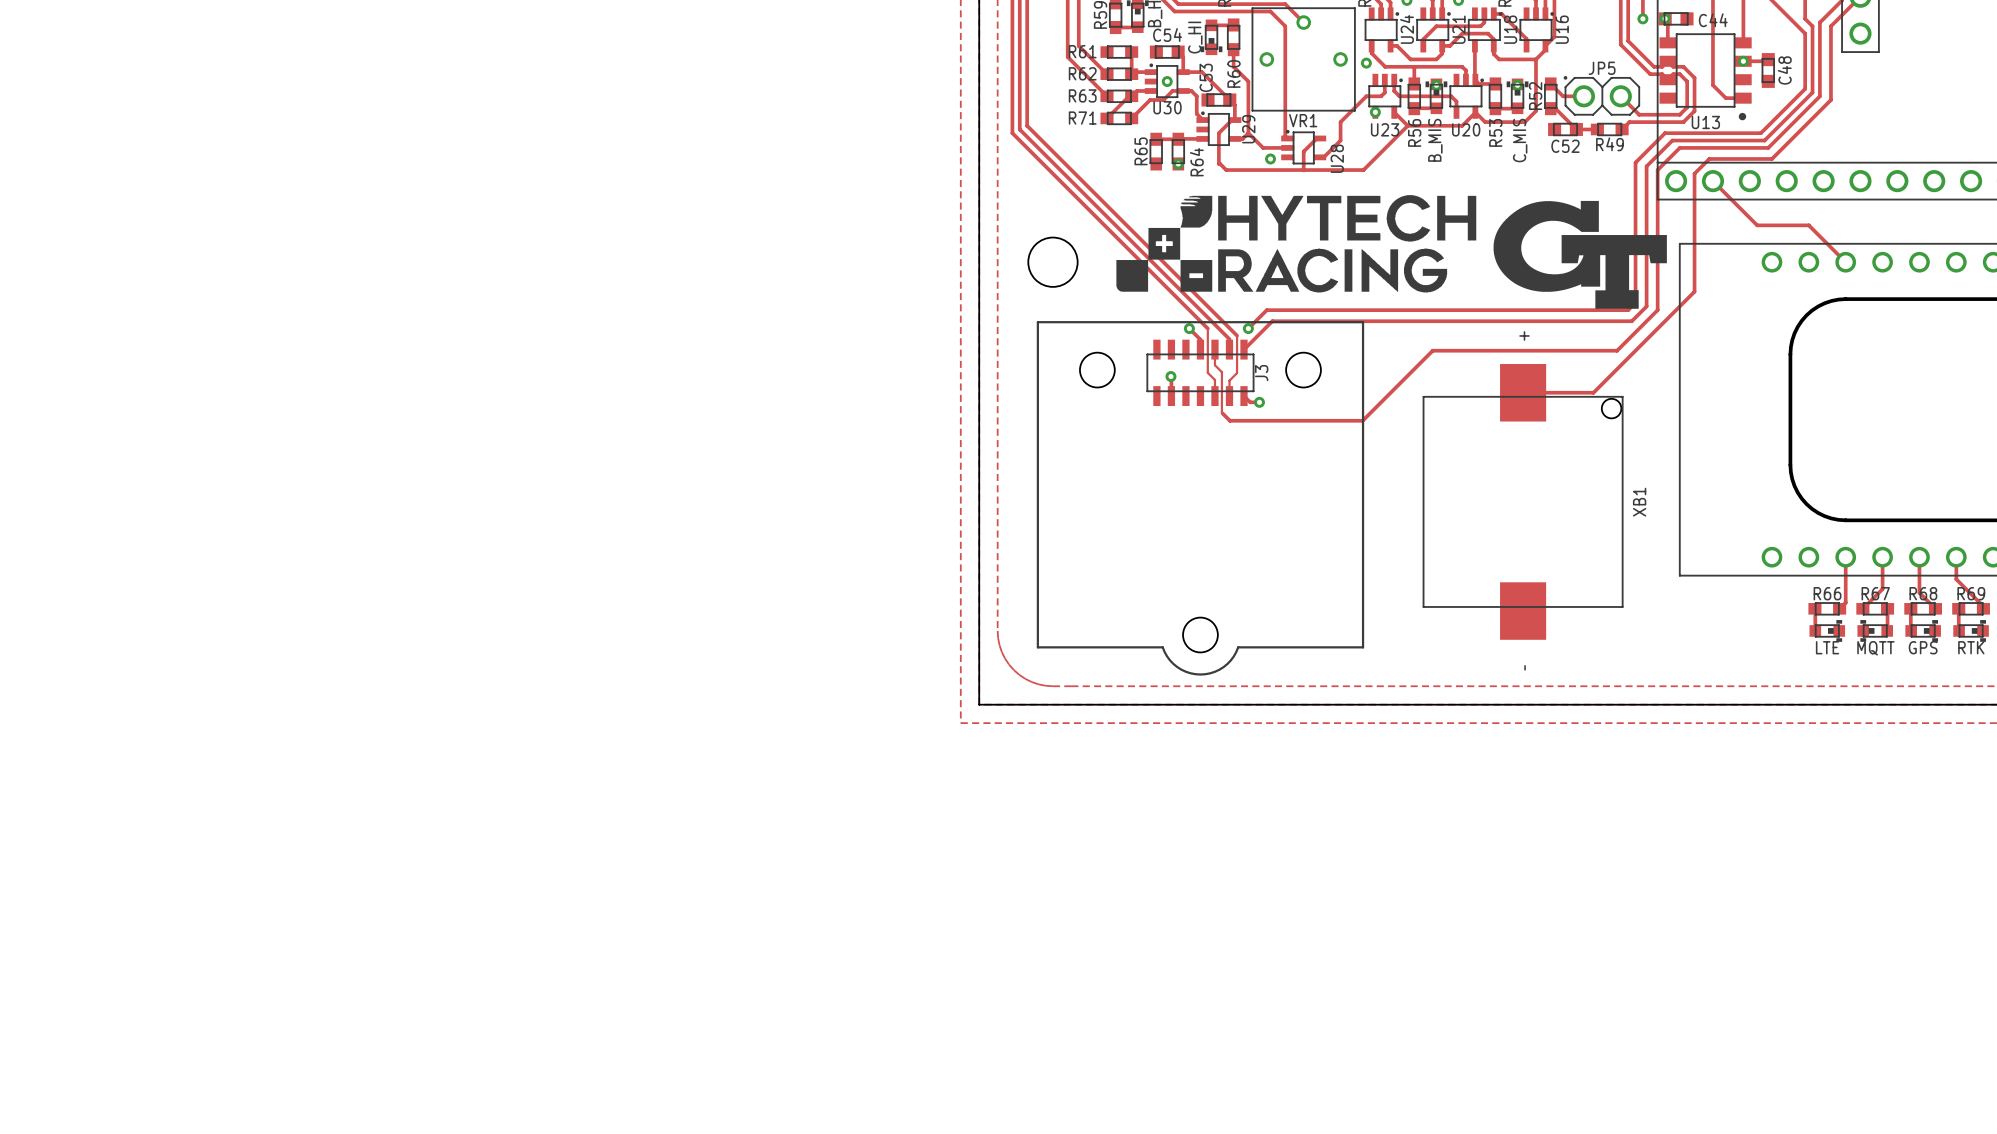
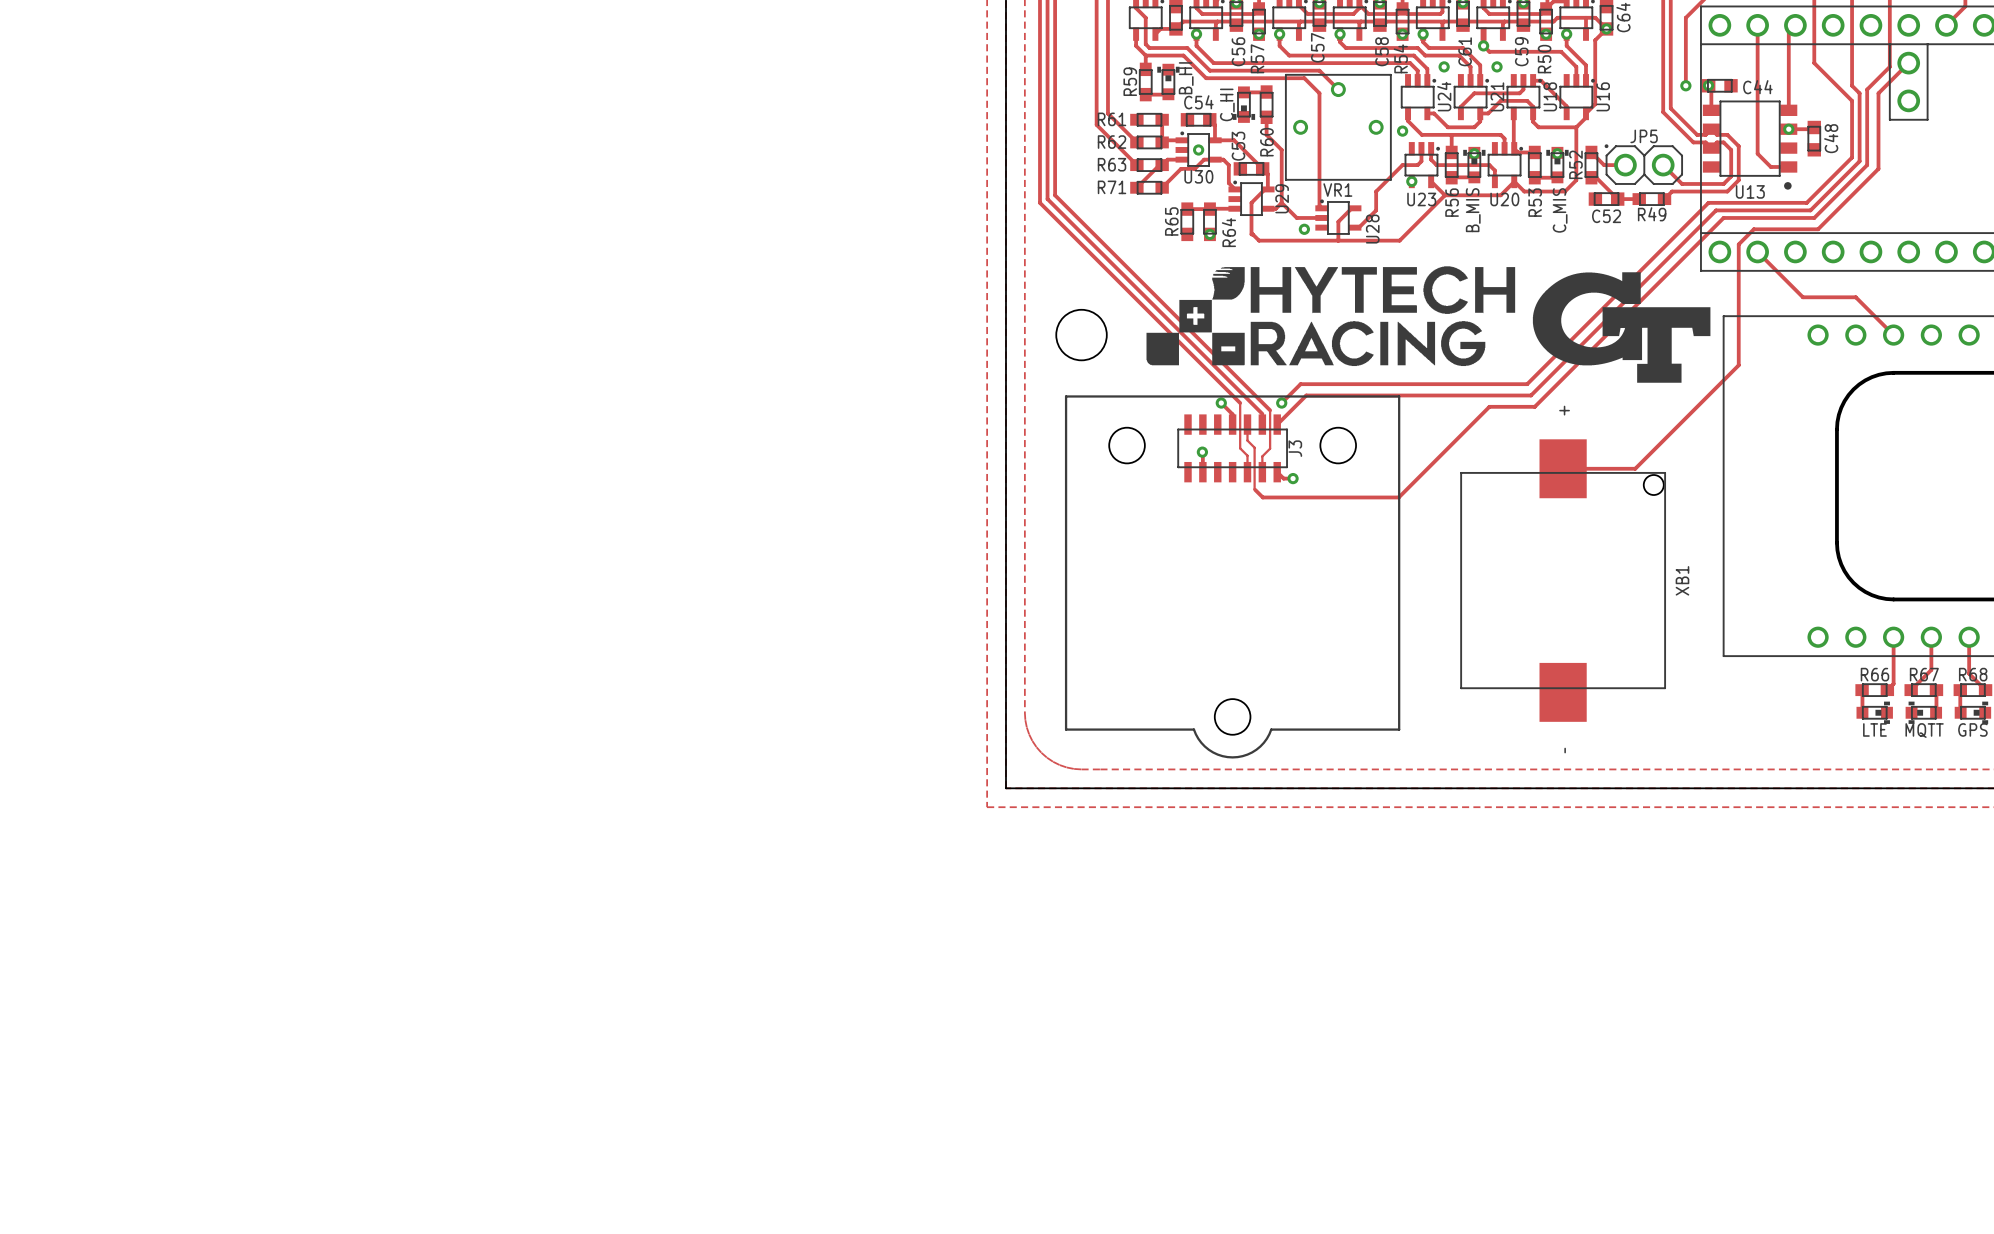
track: (1635, 162) (1635, 302) (1628, 310) (1488, 310) -> (1678, 233) (1527, 384)
track: (1646, 166) (1646, 306) (1631, 321) (1491, 321) -> (1689, 236) (1531, 395)
track: (1657, 170) (1657, 310) (1617, 350) (1432, 350) -> (1700, 240) (1534, 406) (1489, 406) (1470, 425)

